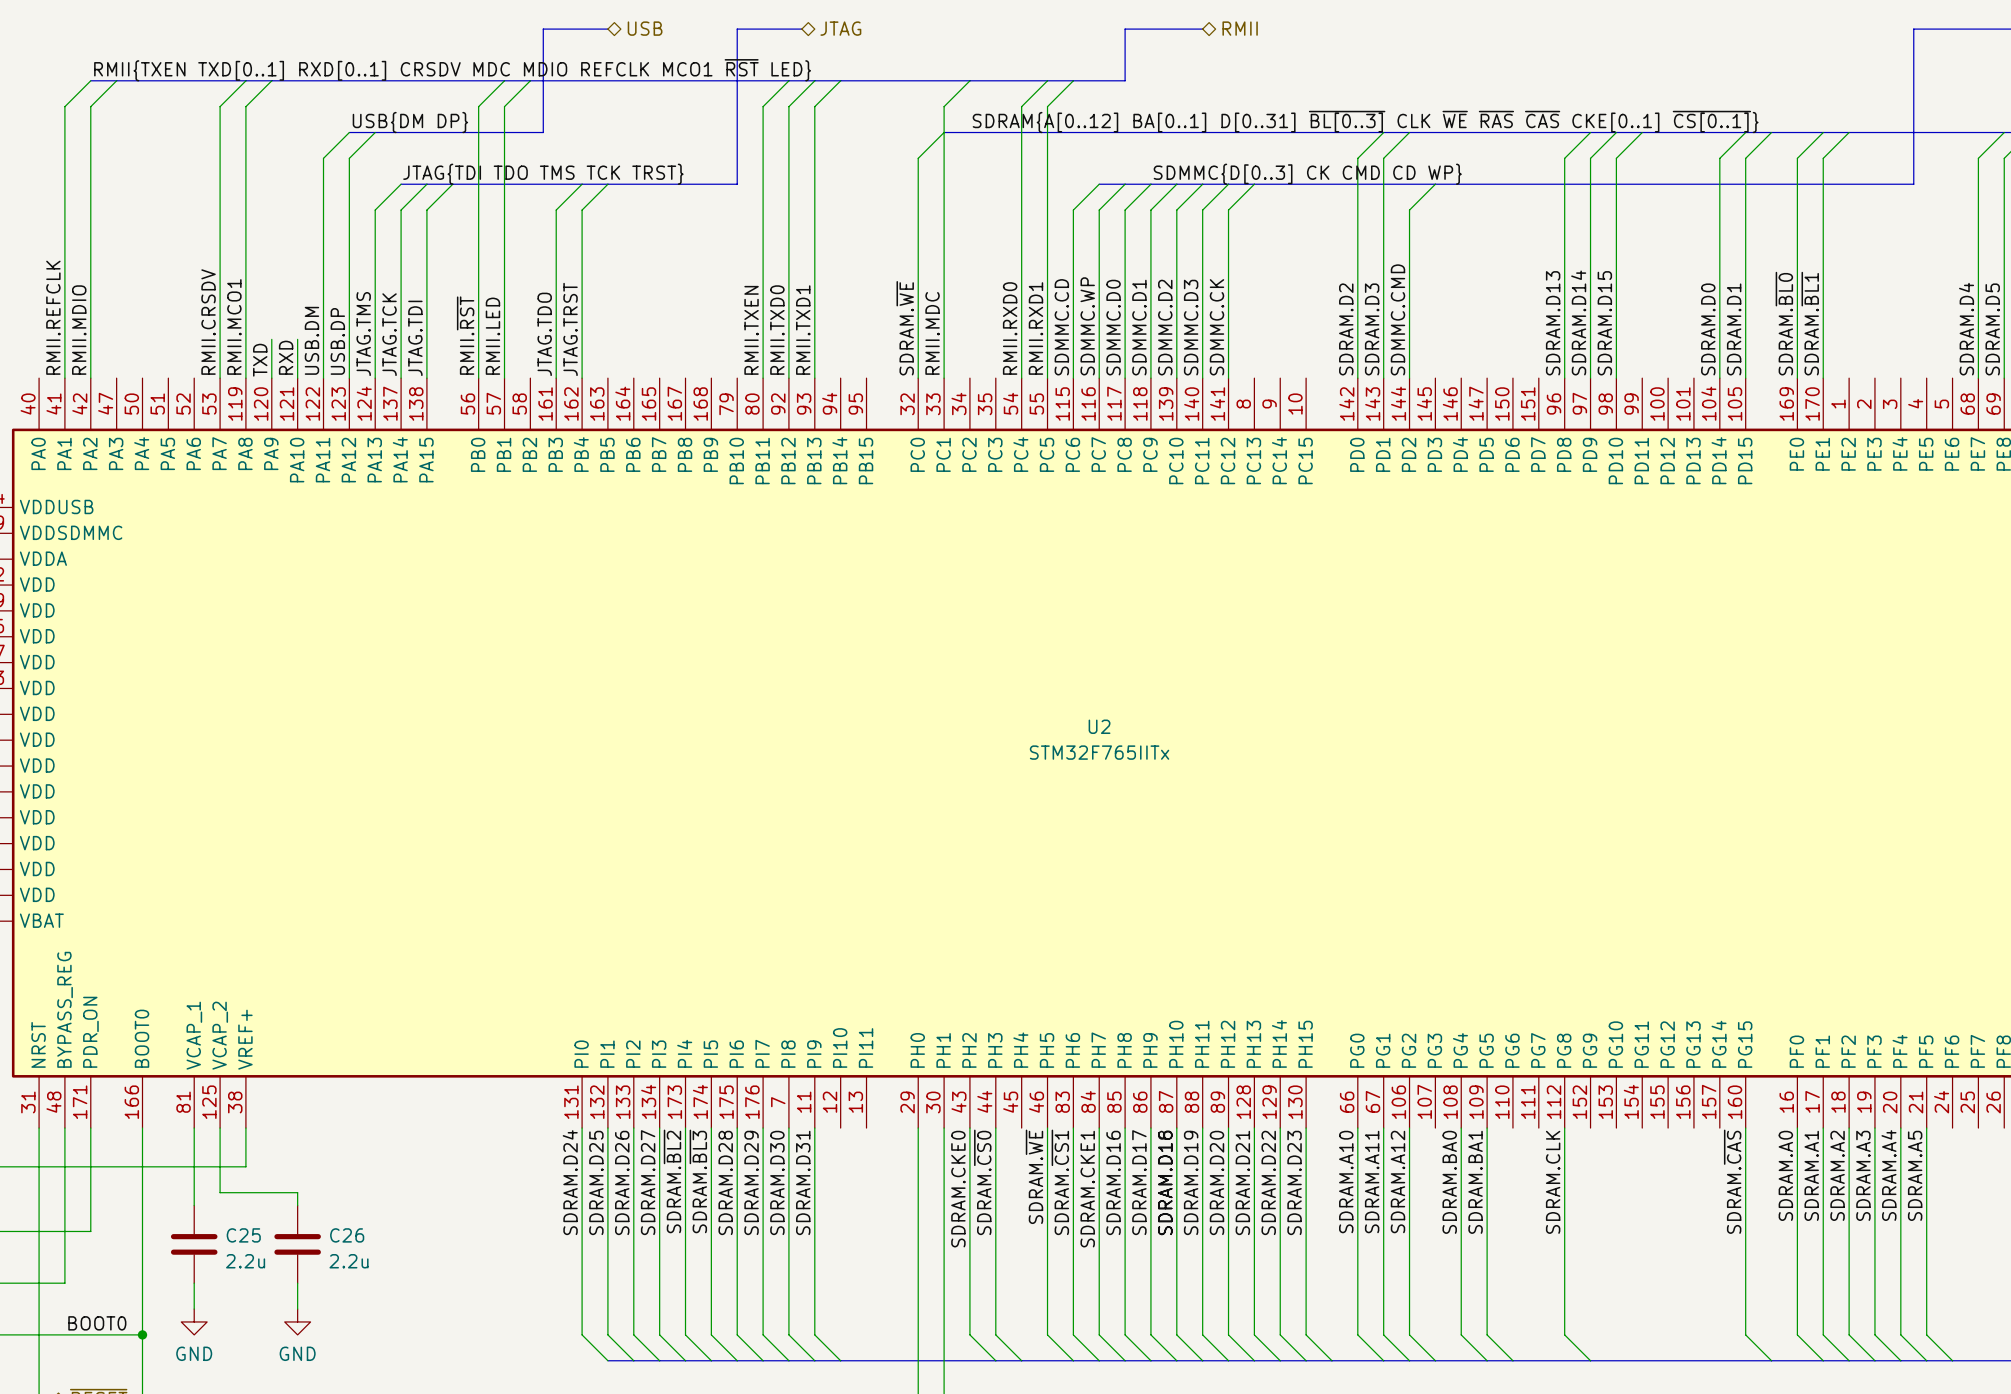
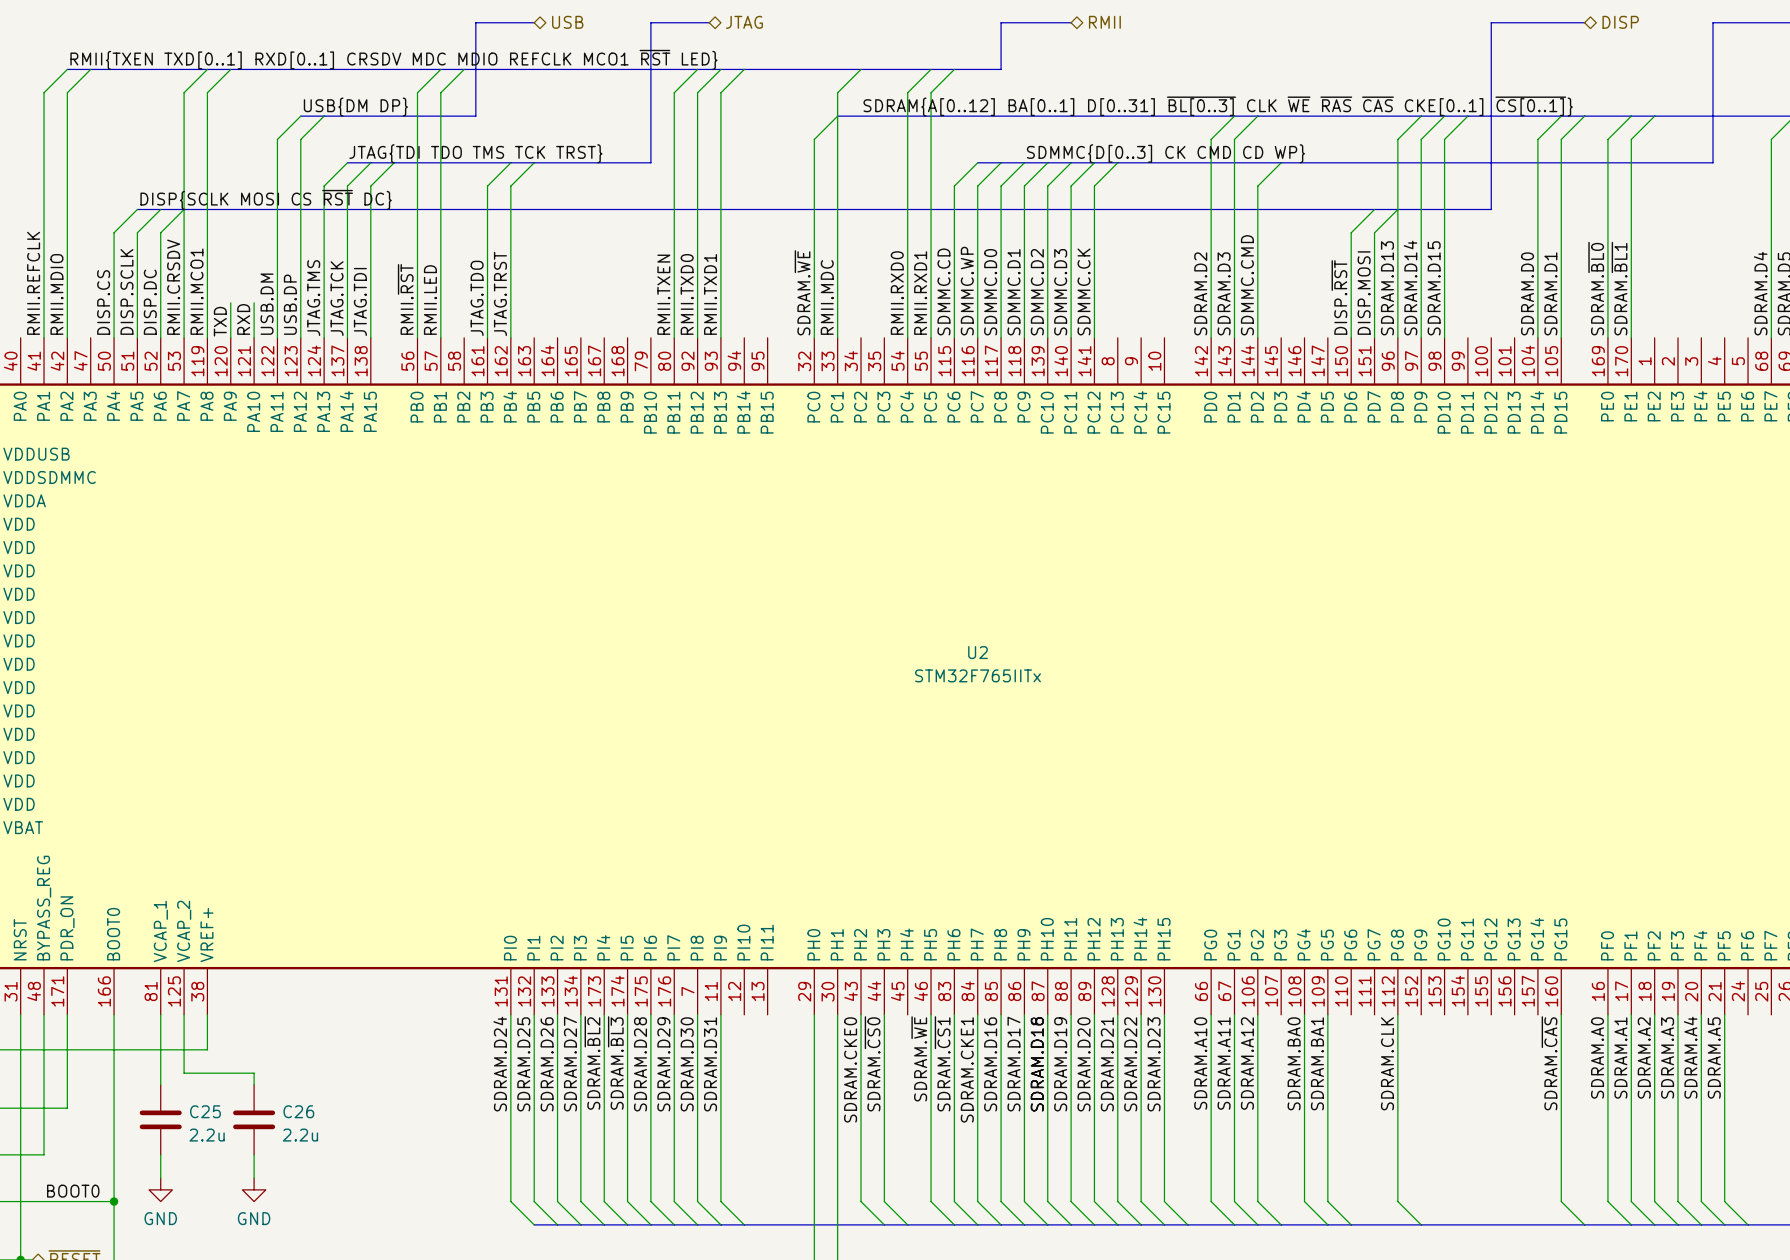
hierarchical label: none -> DISP (1620, 22)
bus: none -> (1584, 22) (1491, 22) (1491, 209) (137, 209)
label: none -> DISP{SCLK MOSI CS ~{RST} DC} (266, 199)
wire: none -> (137, 209) (114, 232) (114, 337)
wire: none -> (160, 209) (137, 232) (137, 337)
wire: none -> (184, 209) (160, 232) (160, 337)
wire: none -> (1374, 209) (1351, 232) (1351, 337)
wire: none -> (1397, 209) (1374, 232) (1374, 337)
label: none -> DISP.SCLK (126, 291)
label: none -> DISP.MOSI (1364, 293)
label: none -> DISP.~{RST} (1339, 297)
label: none -> DISP.CS (103, 302)
label: none -> DISP.DC (150, 302)

